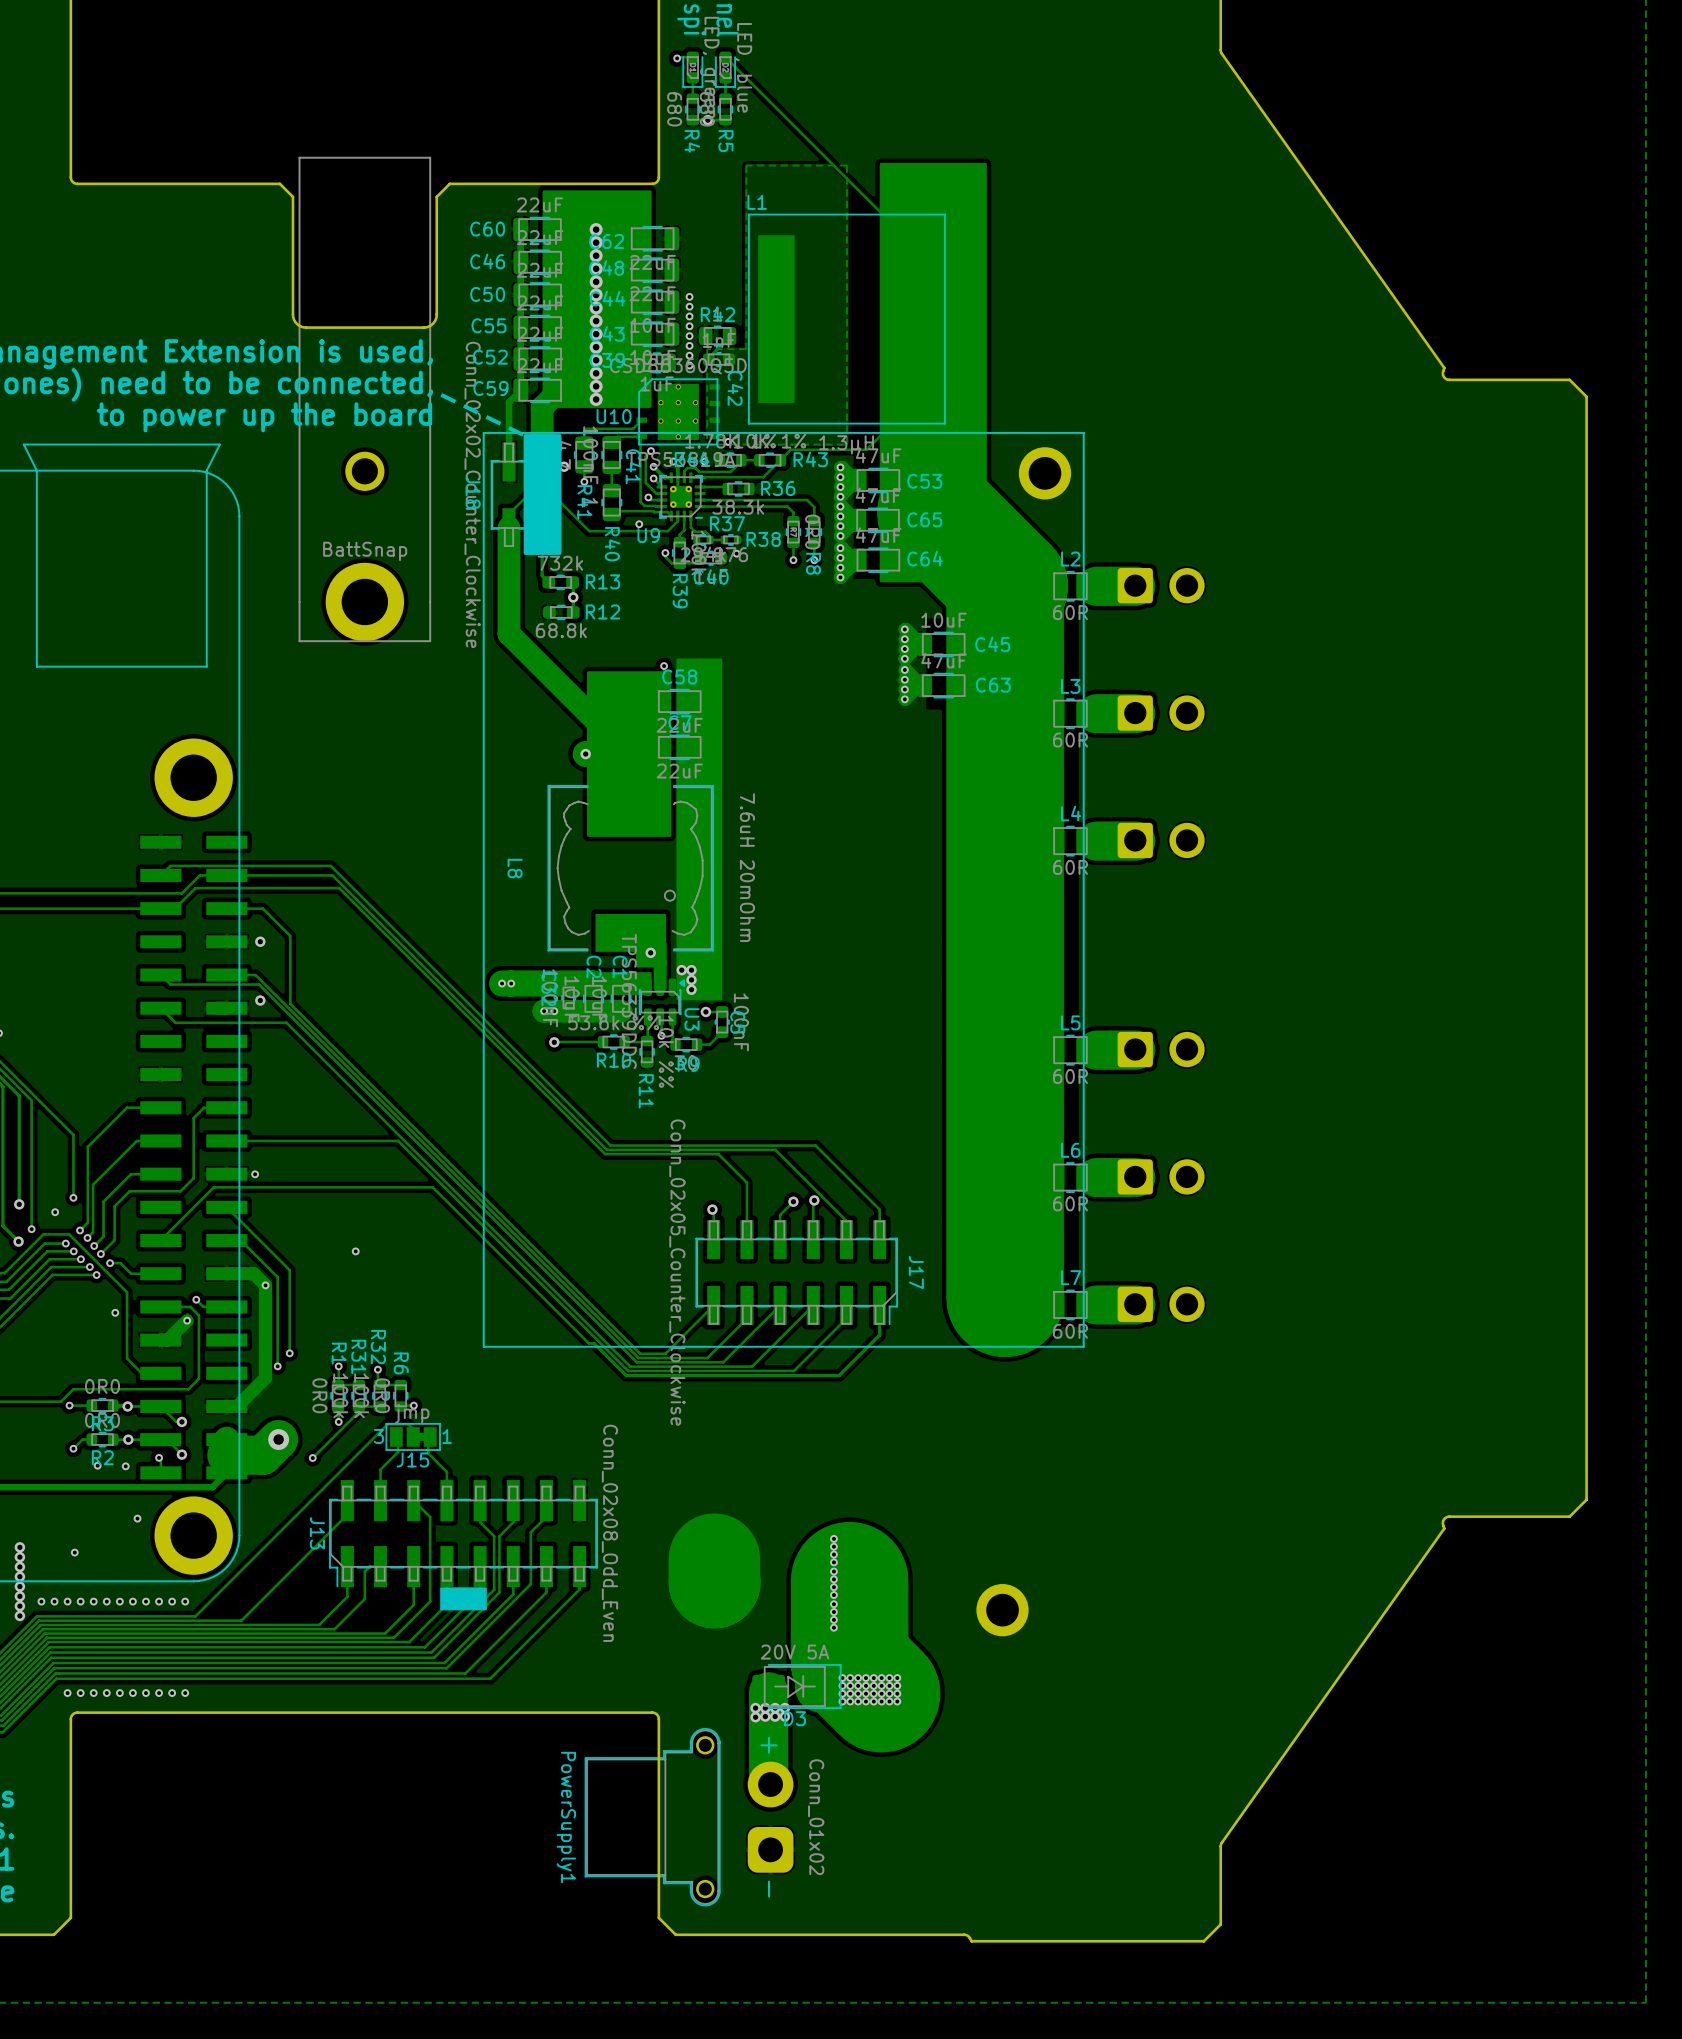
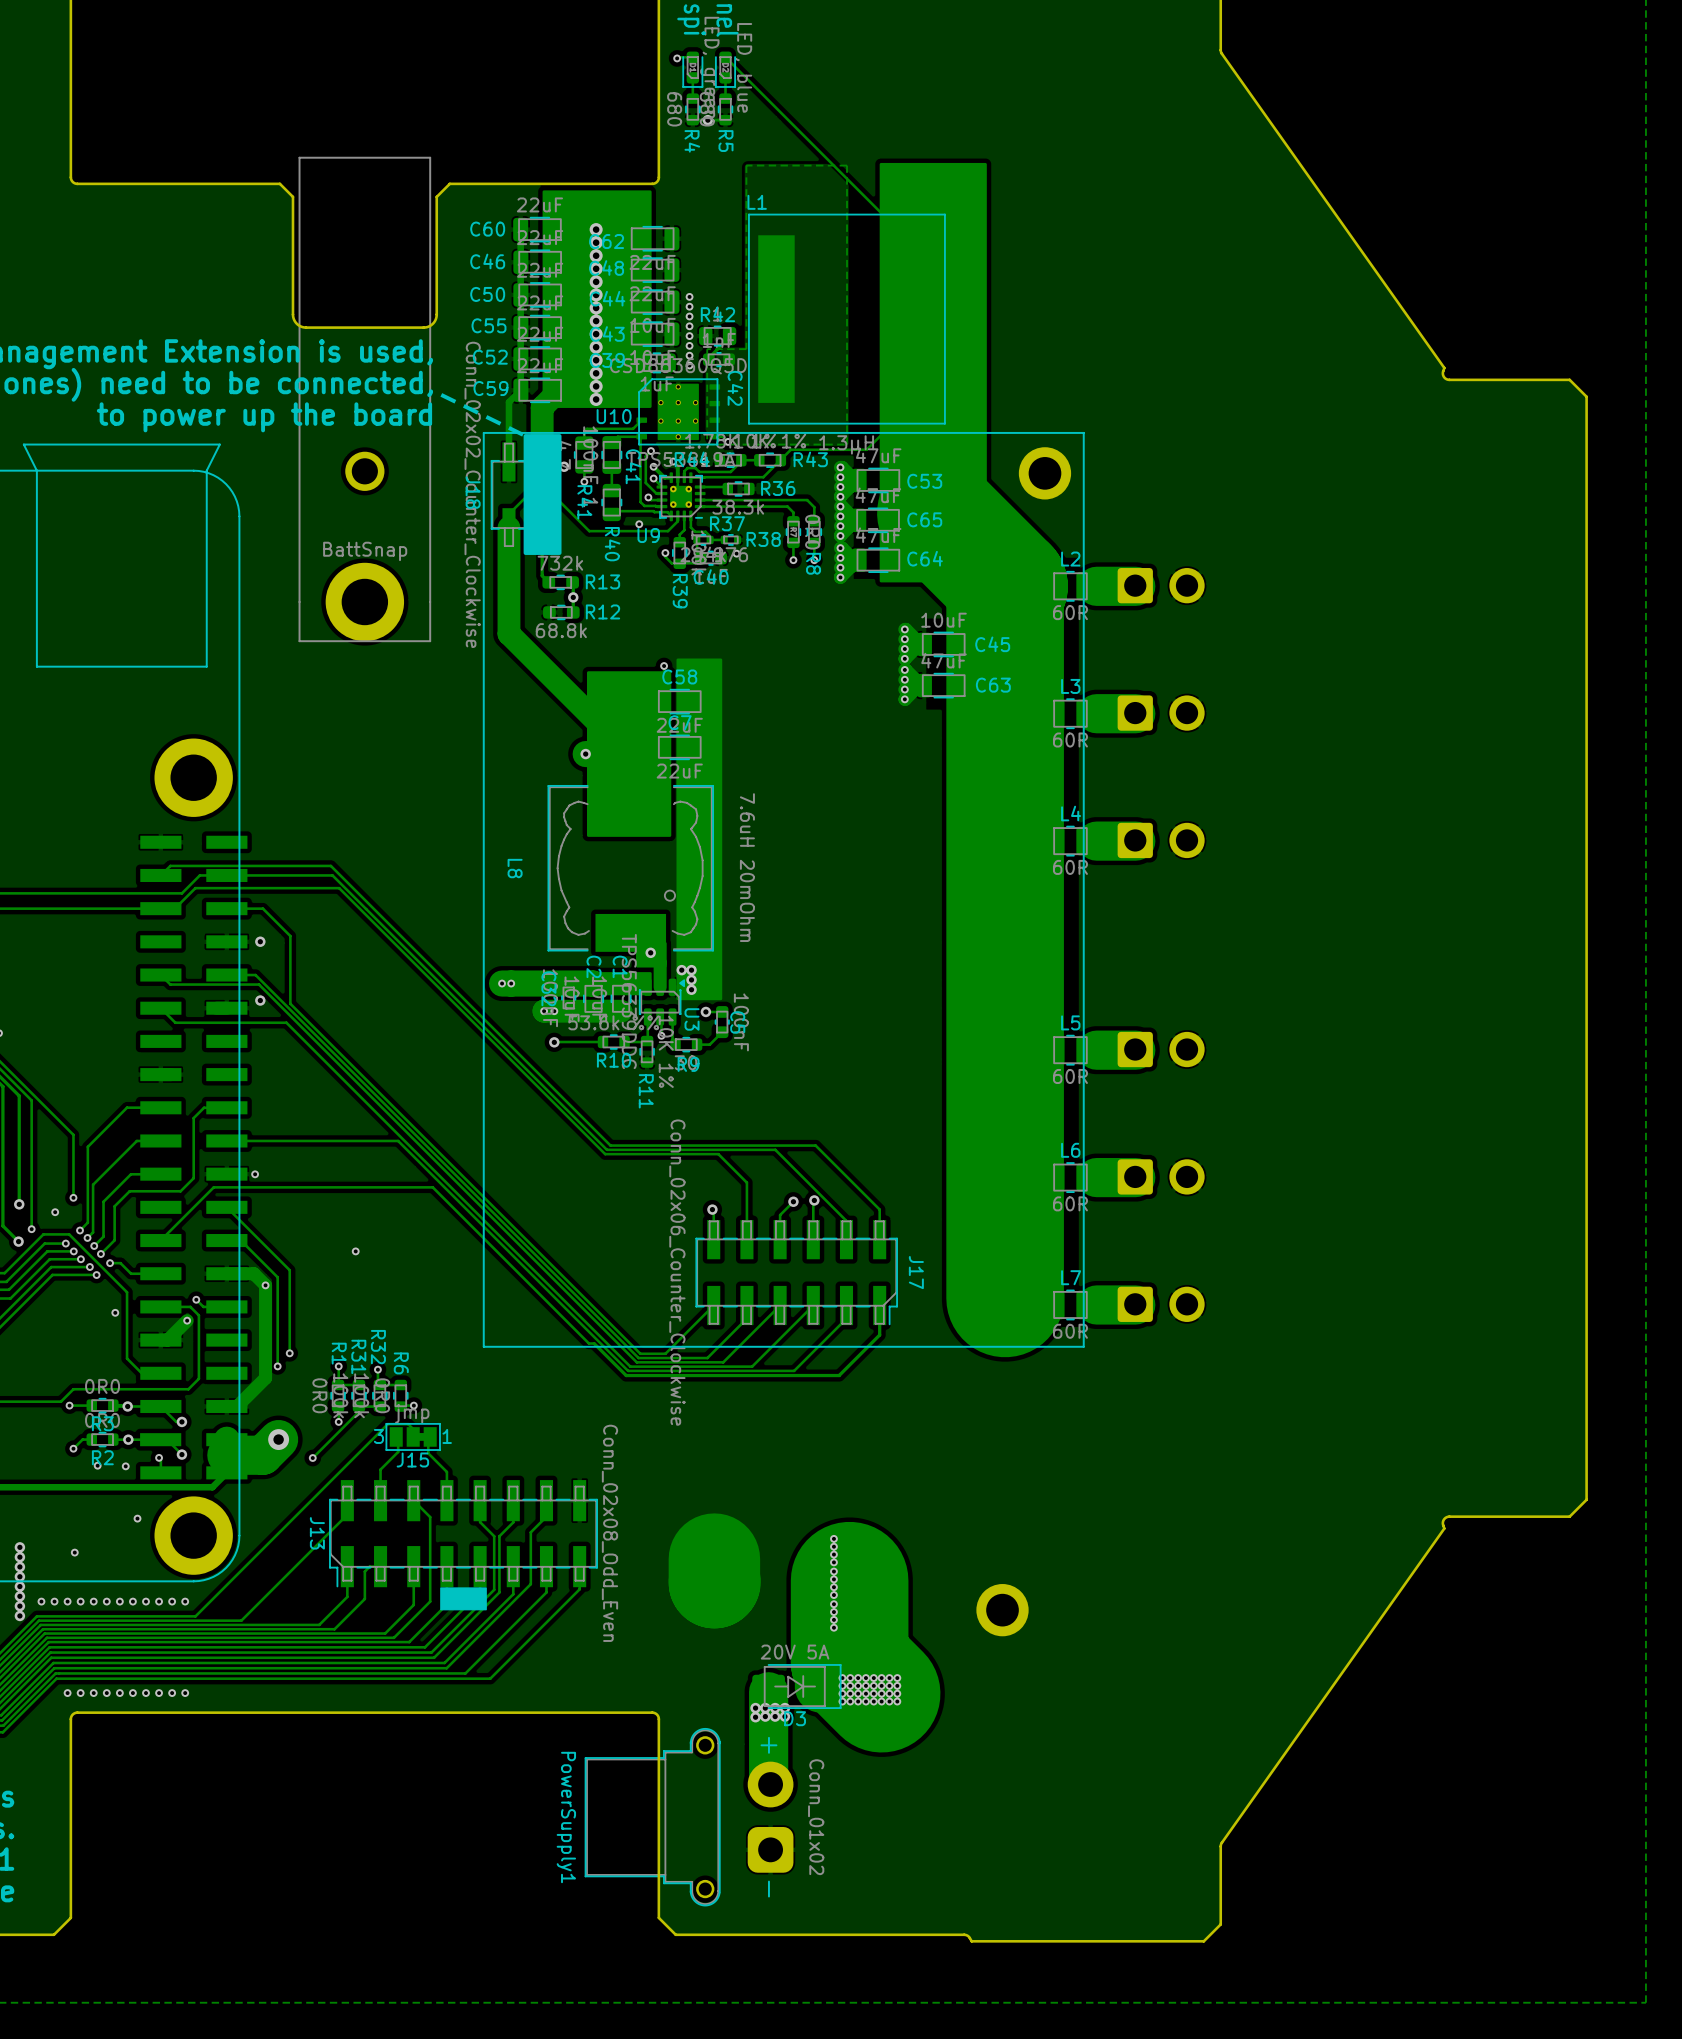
R11 value: 10k %% (666, 1051) -> 10K 1% (666, 1051)
J17 value: Conn_02x05_Counter_Clockwise (677, 1272) -> Conn_02x06_Counter_Clockwise (677, 1272)

